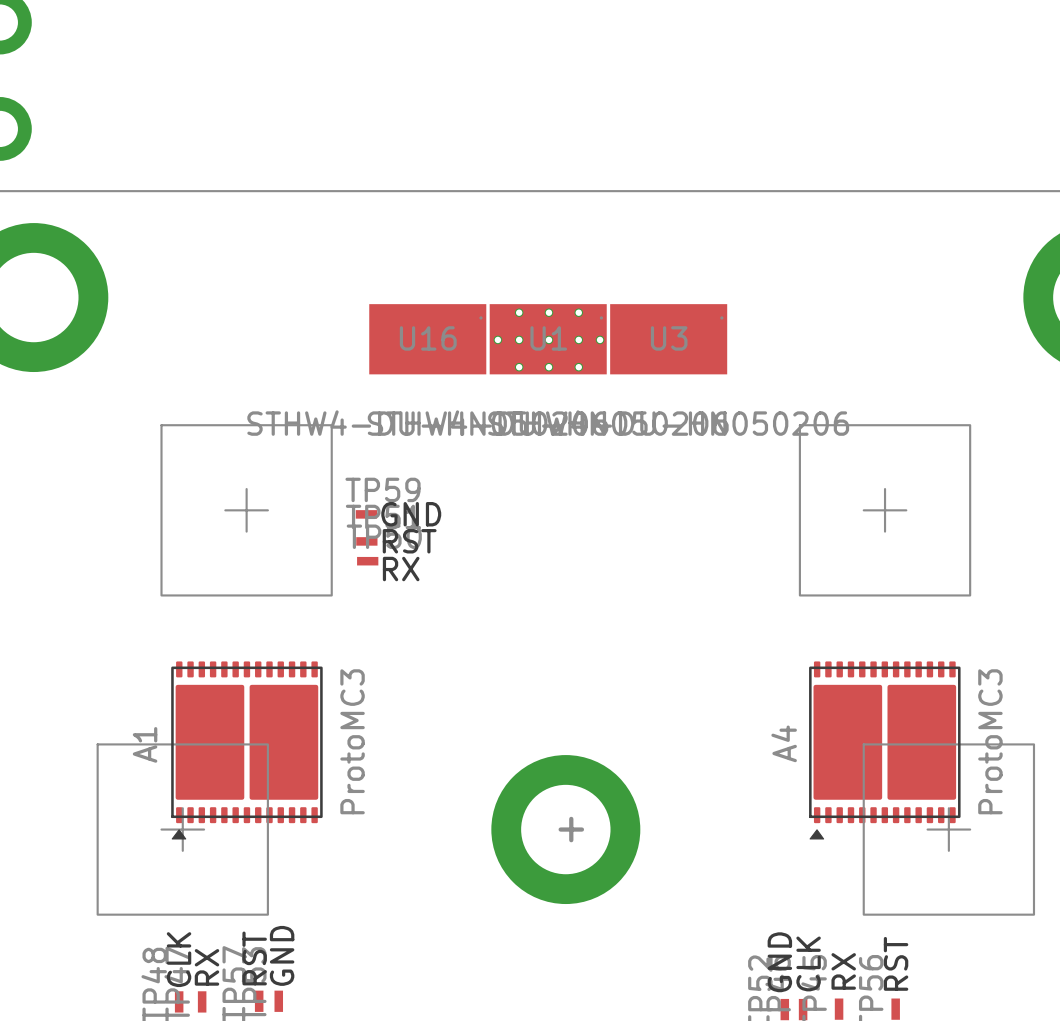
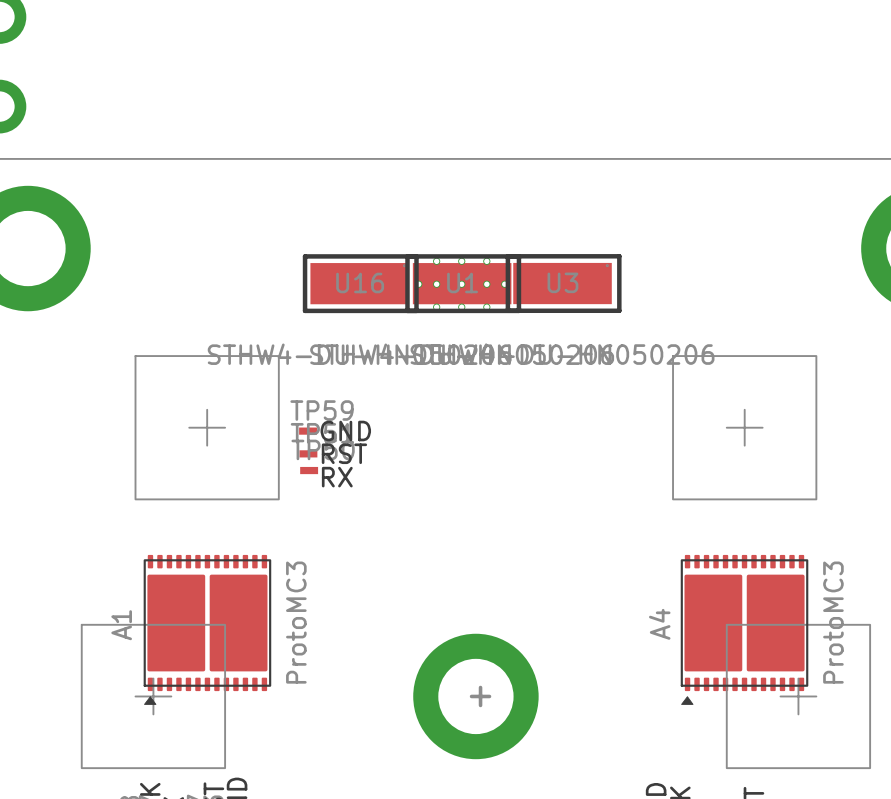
part footprint: [369, 304, 487, 375] -> [302, 254, 419, 314]
part footprint: [489, 304, 607, 375] -> [405, 254, 522, 314]
part footprint: [610, 304, 728, 375] -> [505, 254, 622, 314]

